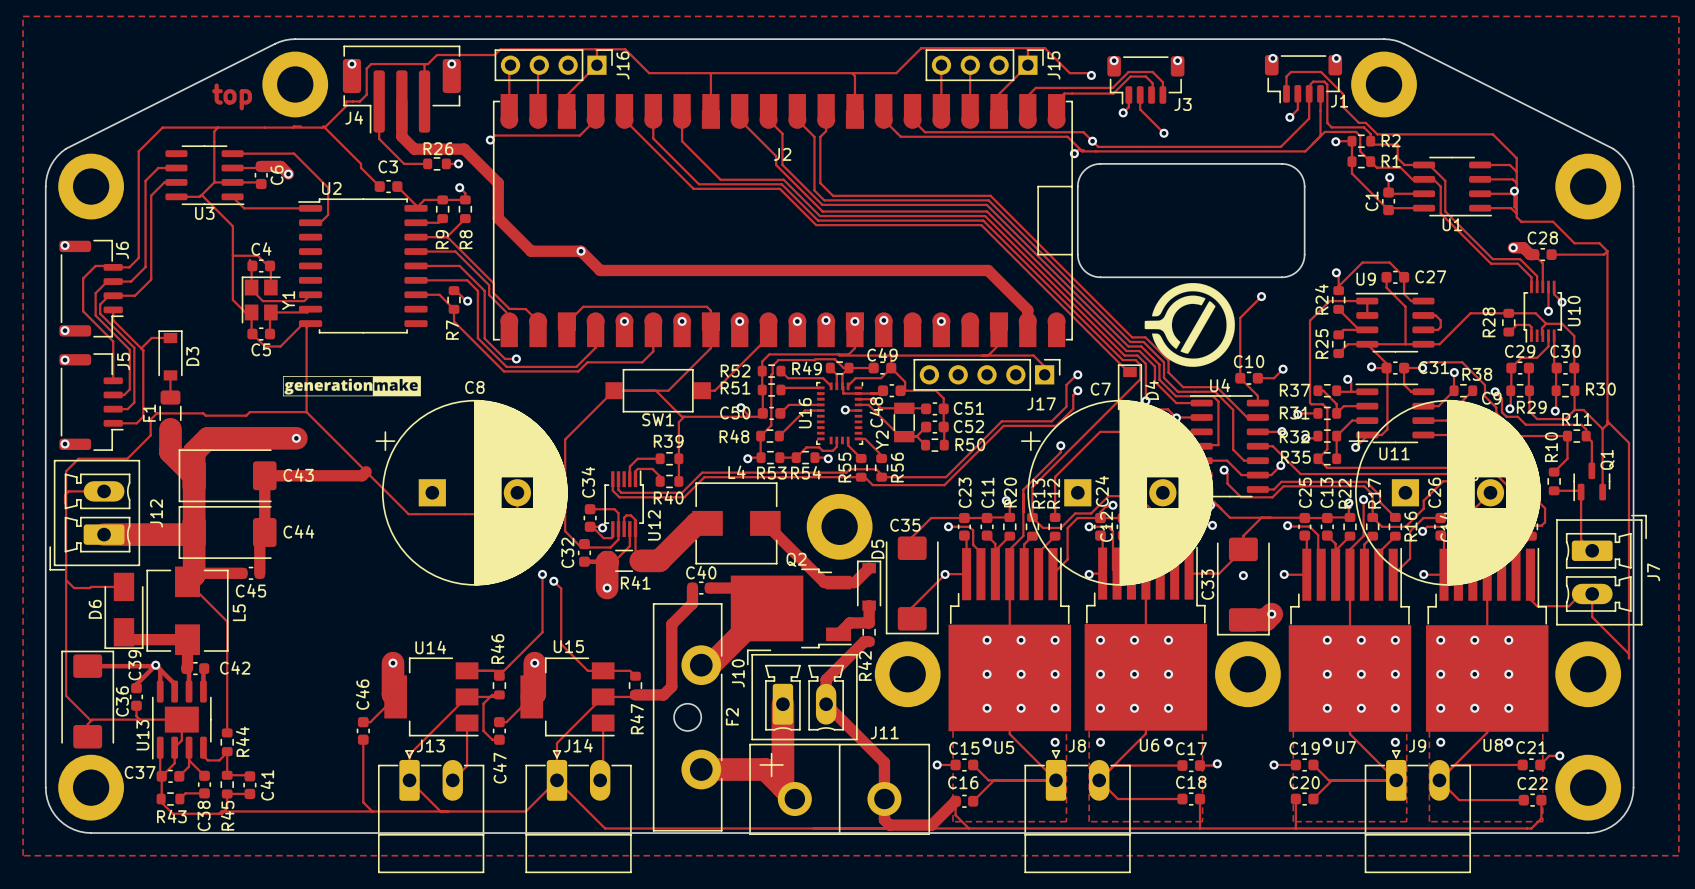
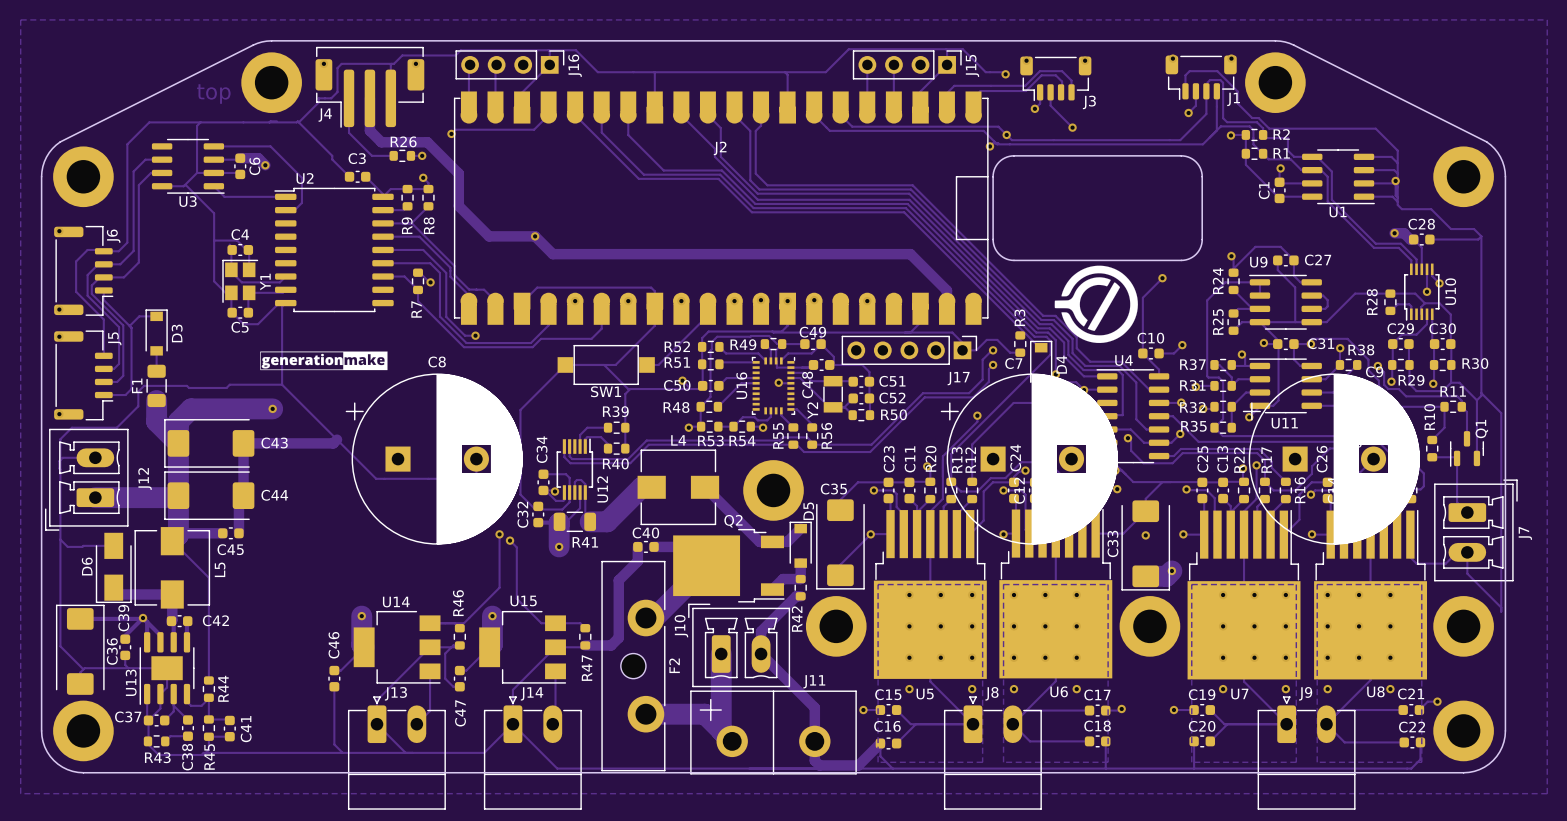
R3: none -> (1020, 344)
track: none -> (962, 350) (976, 350) (986, 339) (997, 339) (1010, 352) (1020, 352)

